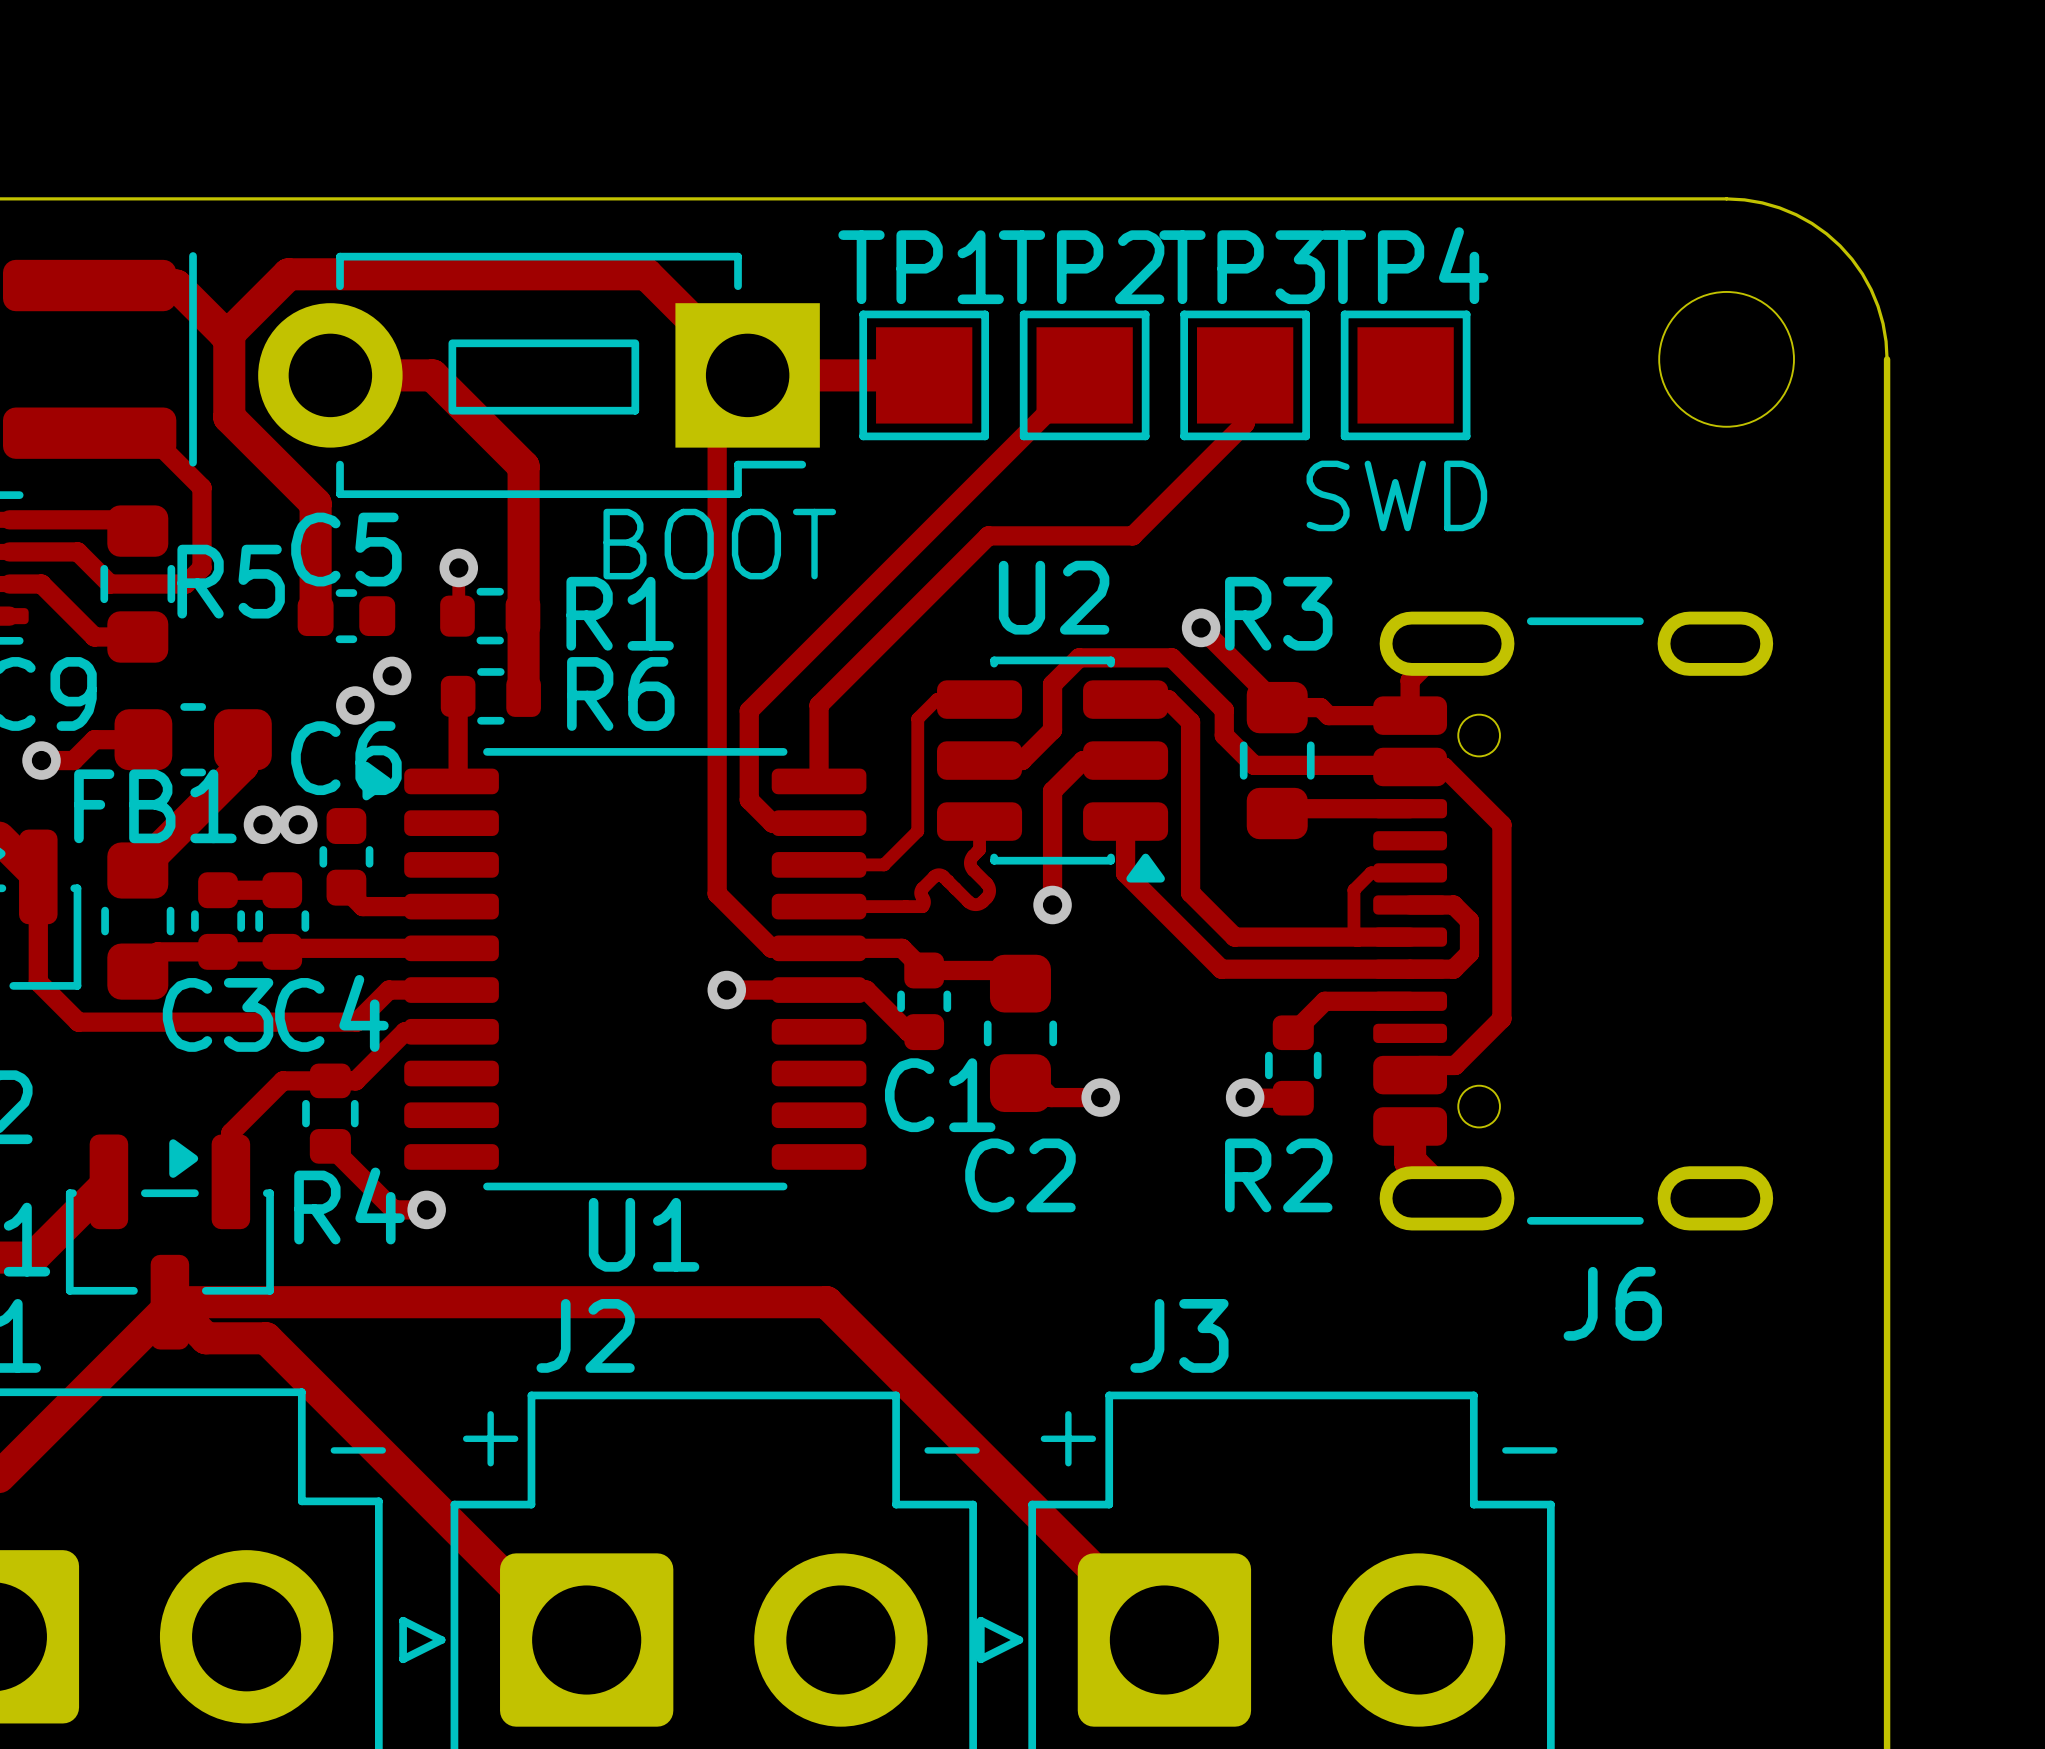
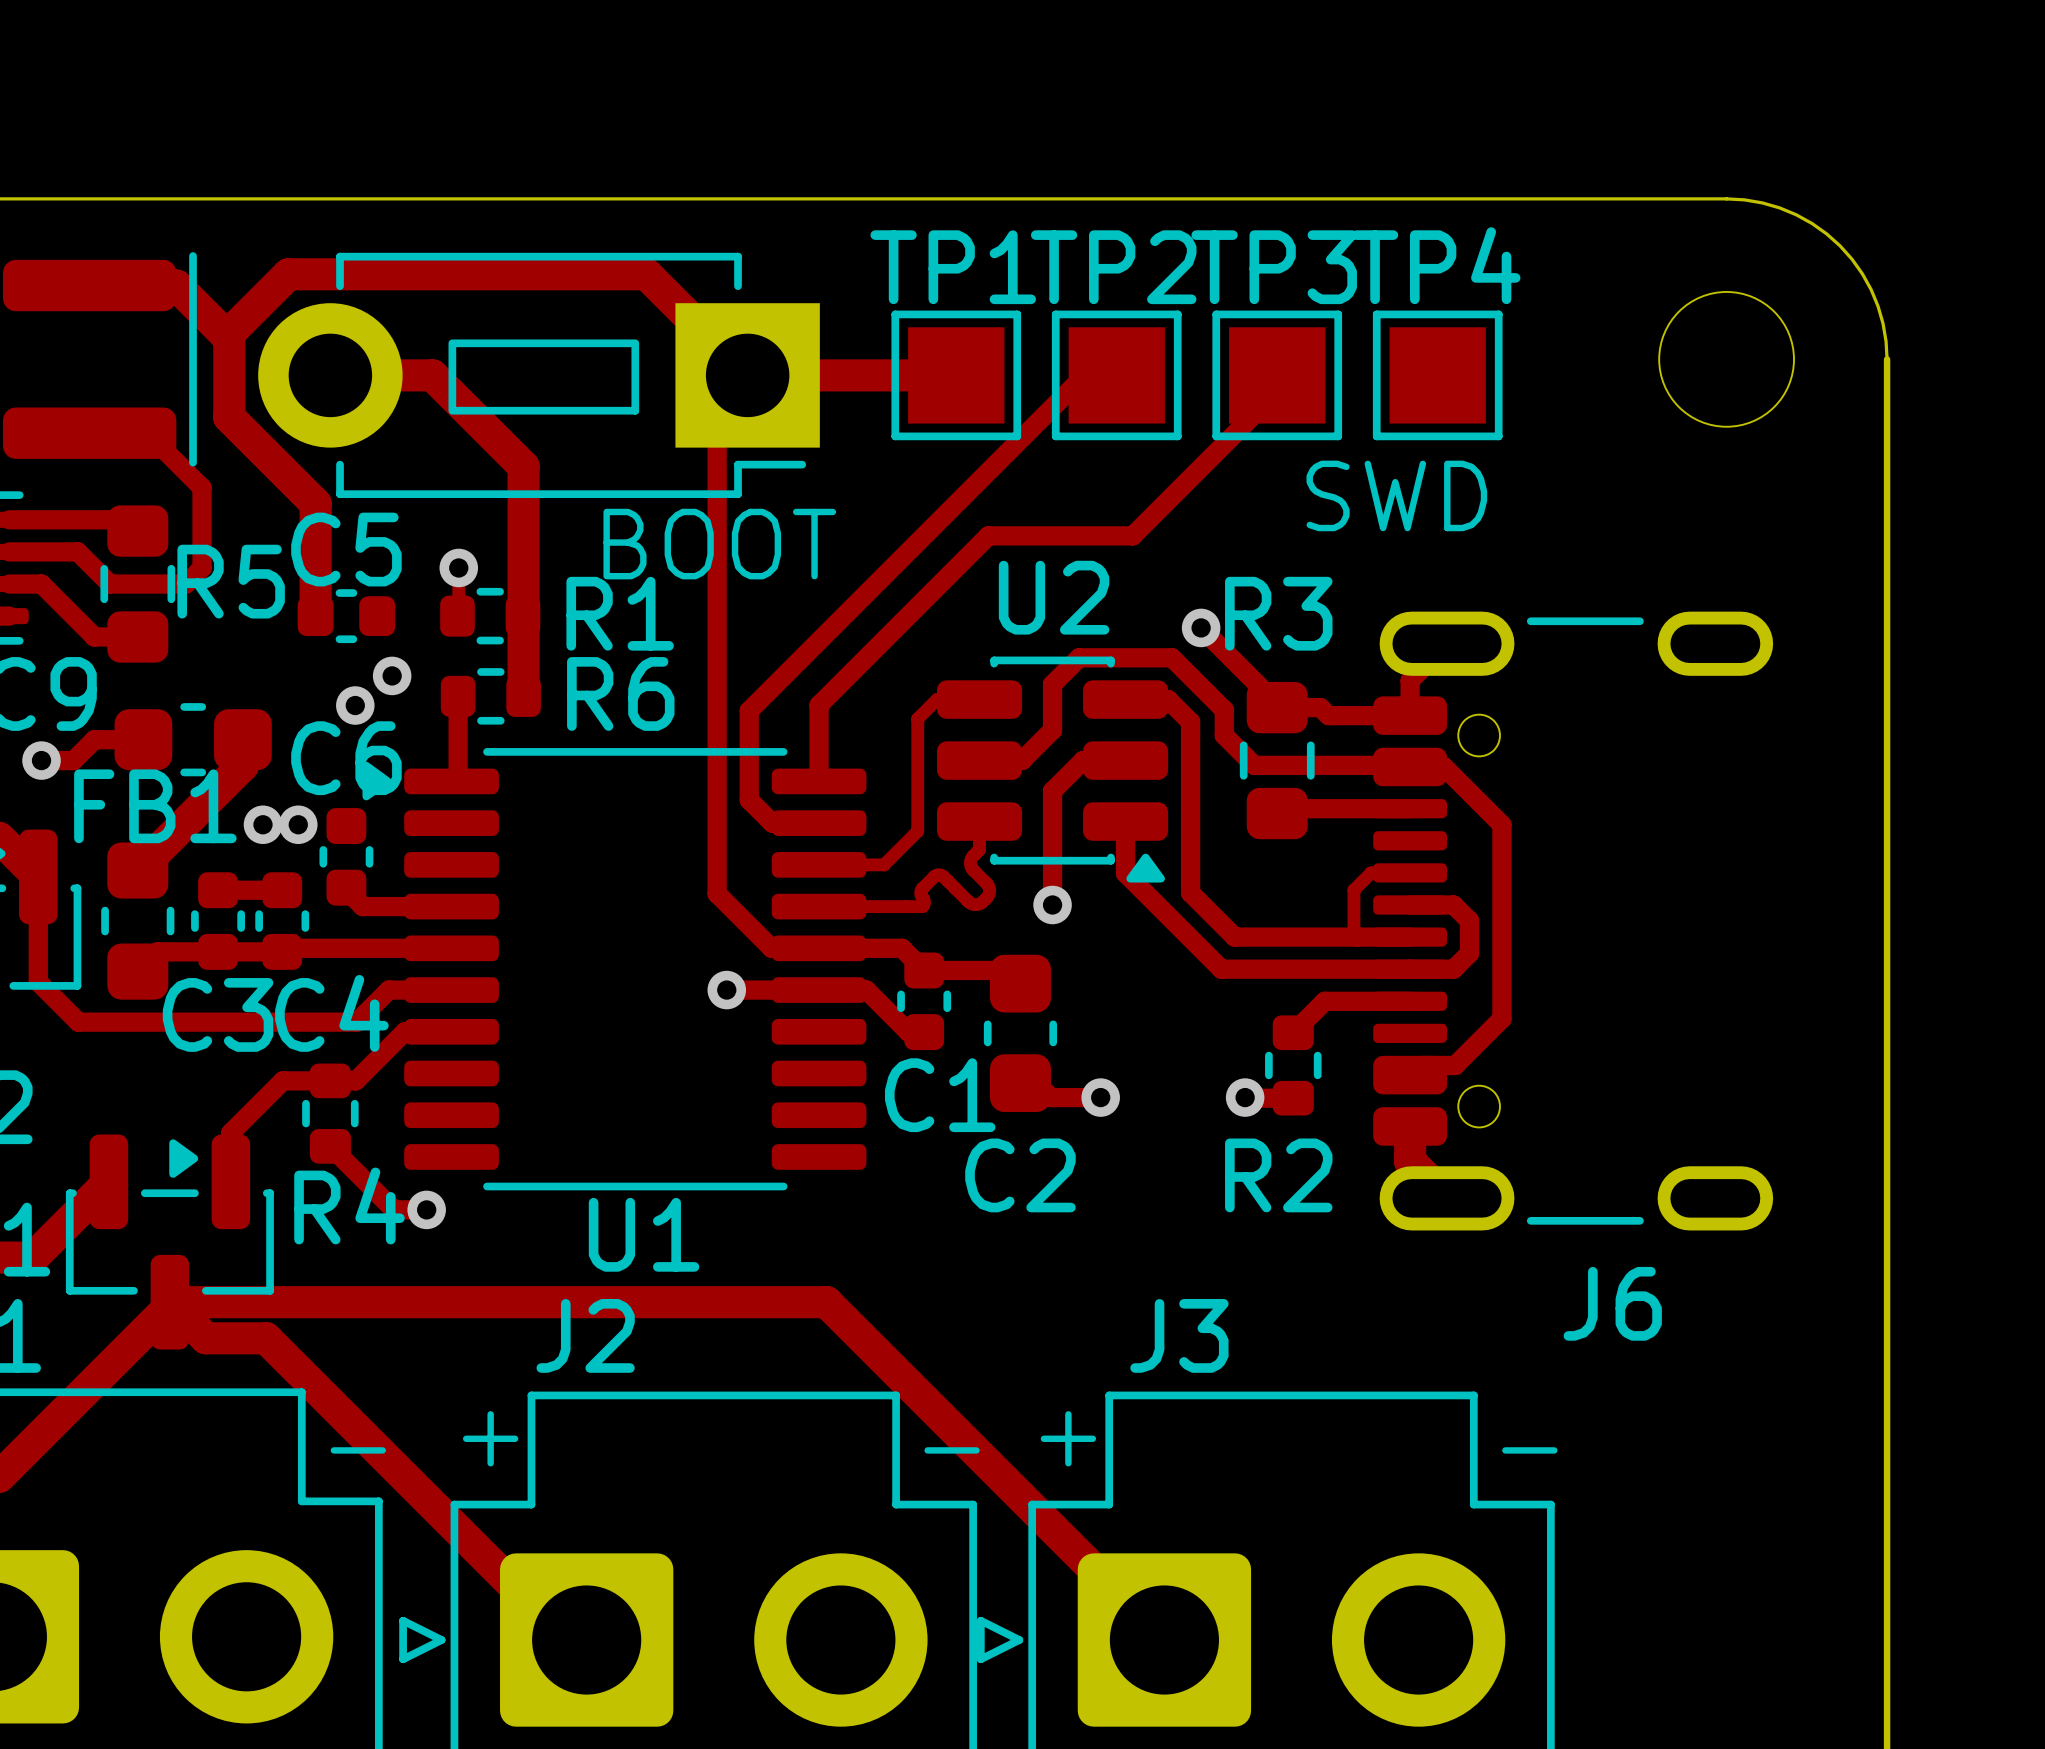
TP1 position: (924, 375) -> (956, 375)
TP2 position: (1084, 375) -> (1116, 375)
TP3 position: (1245, 375) -> (1277, 375)
TP4 position: (1405, 375) -> (1437, 375)

